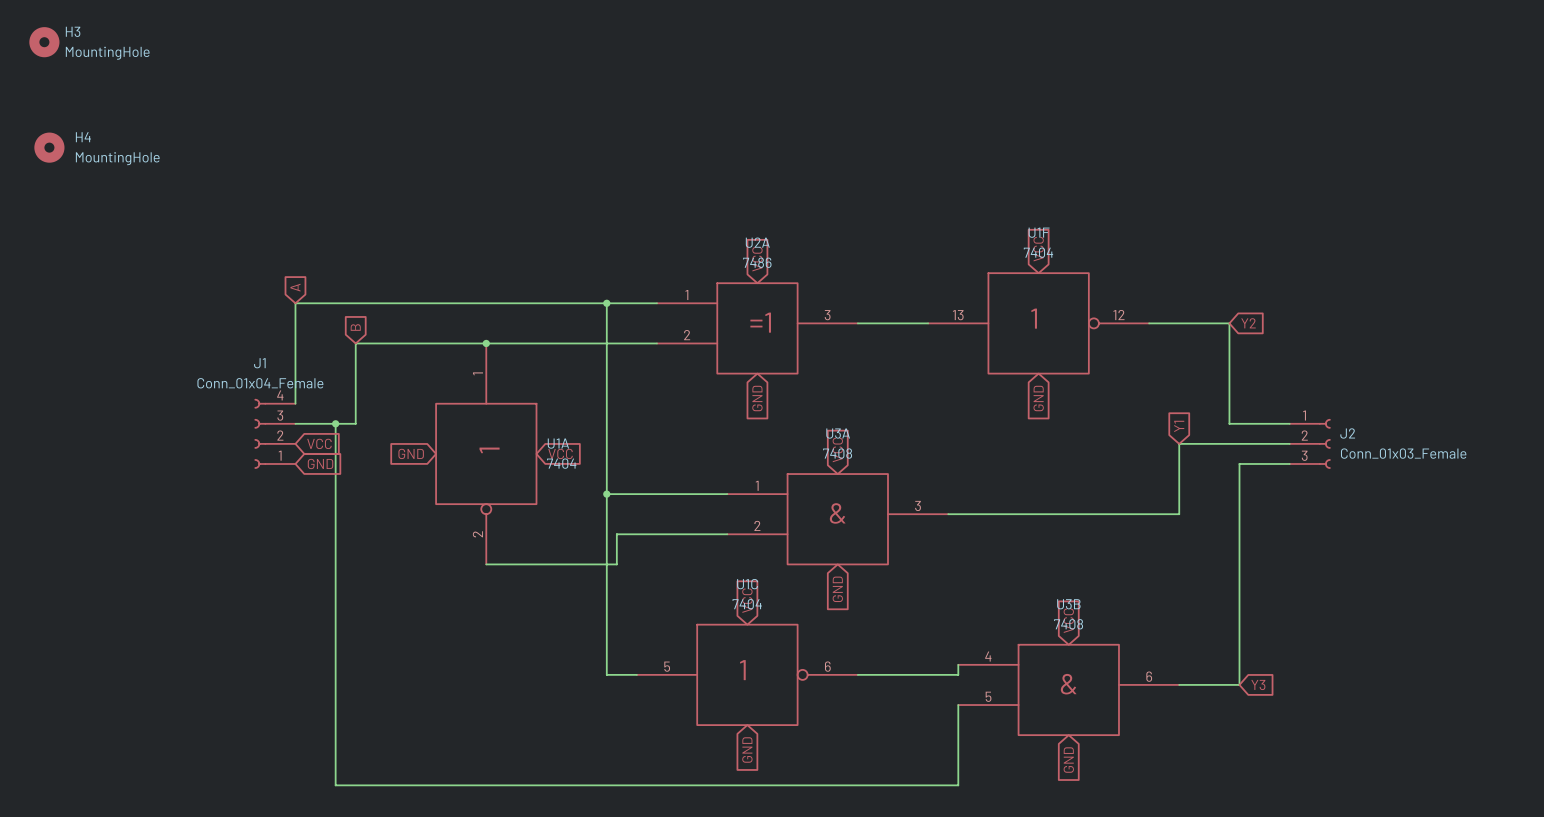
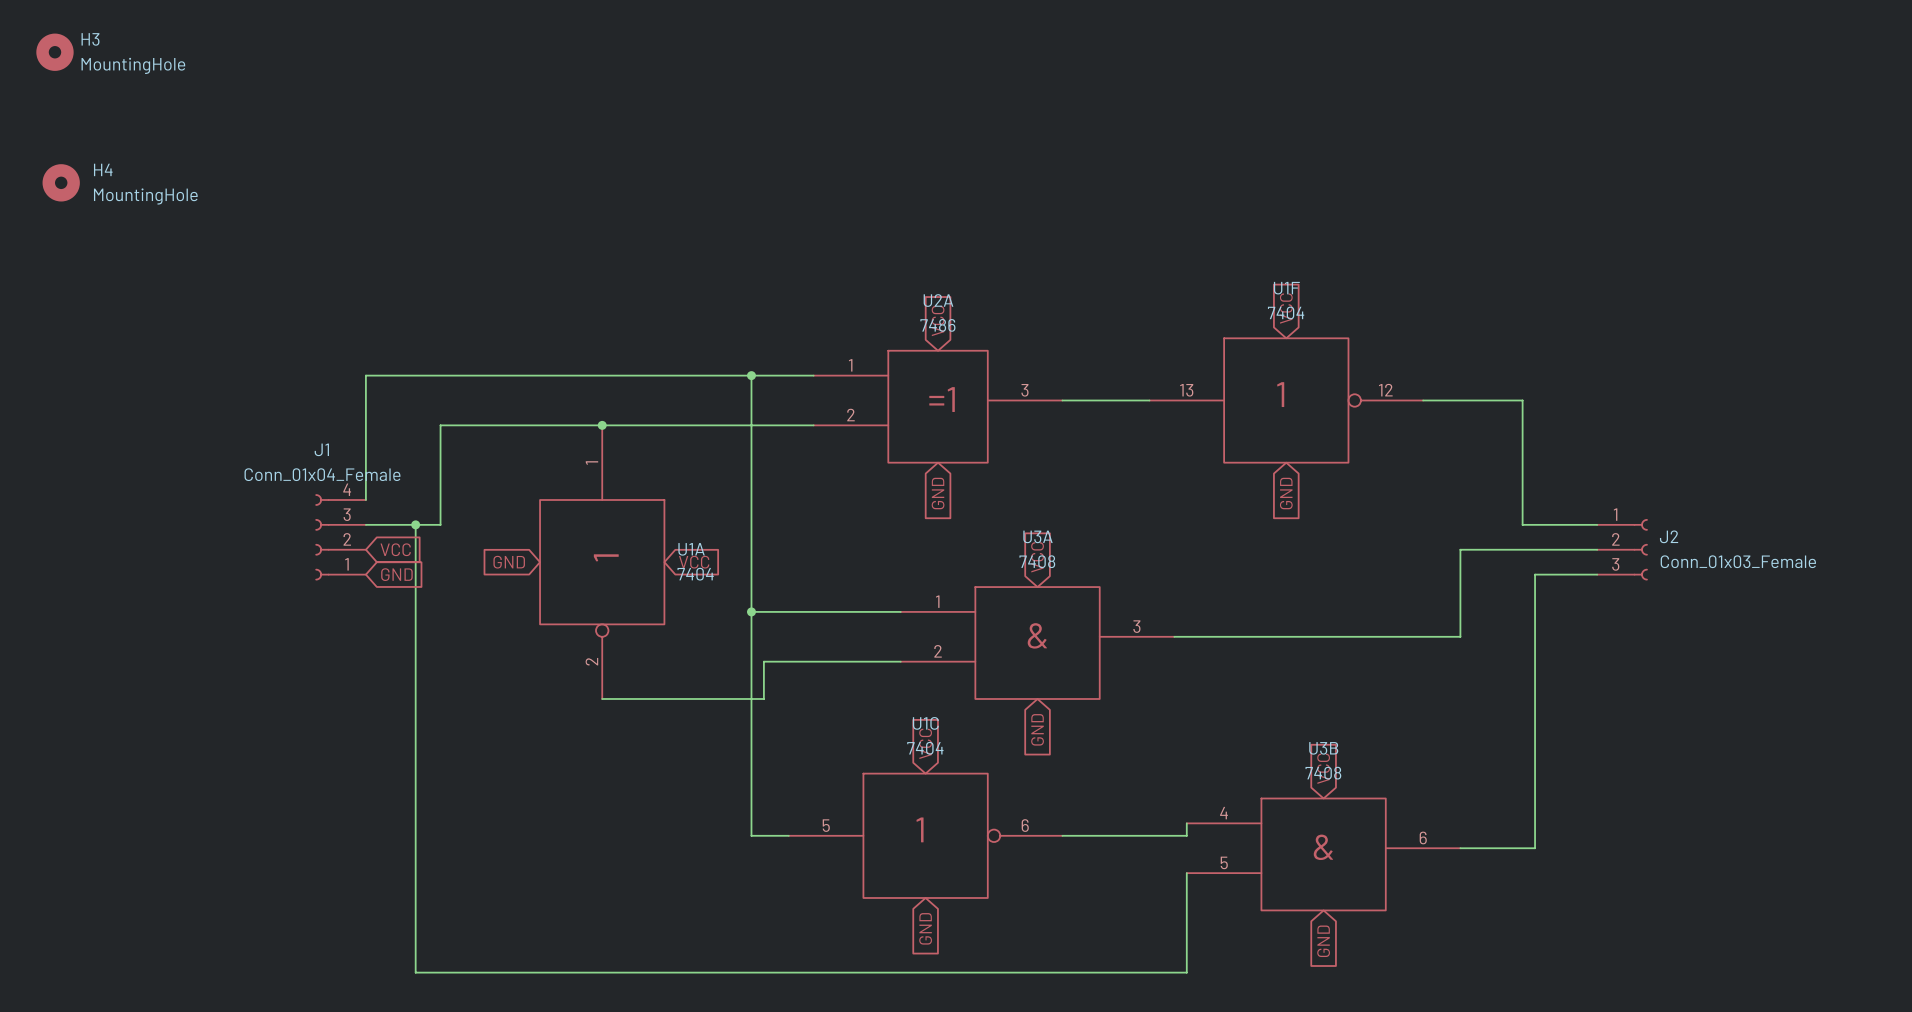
global label: A (295, 287) -> none
global label: Y2 (1248, 323) -> none
global label: B (355, 327) -> none
global label: Y1 (1179, 426) -> none
global label: Y3 (1258, 684) -> none

